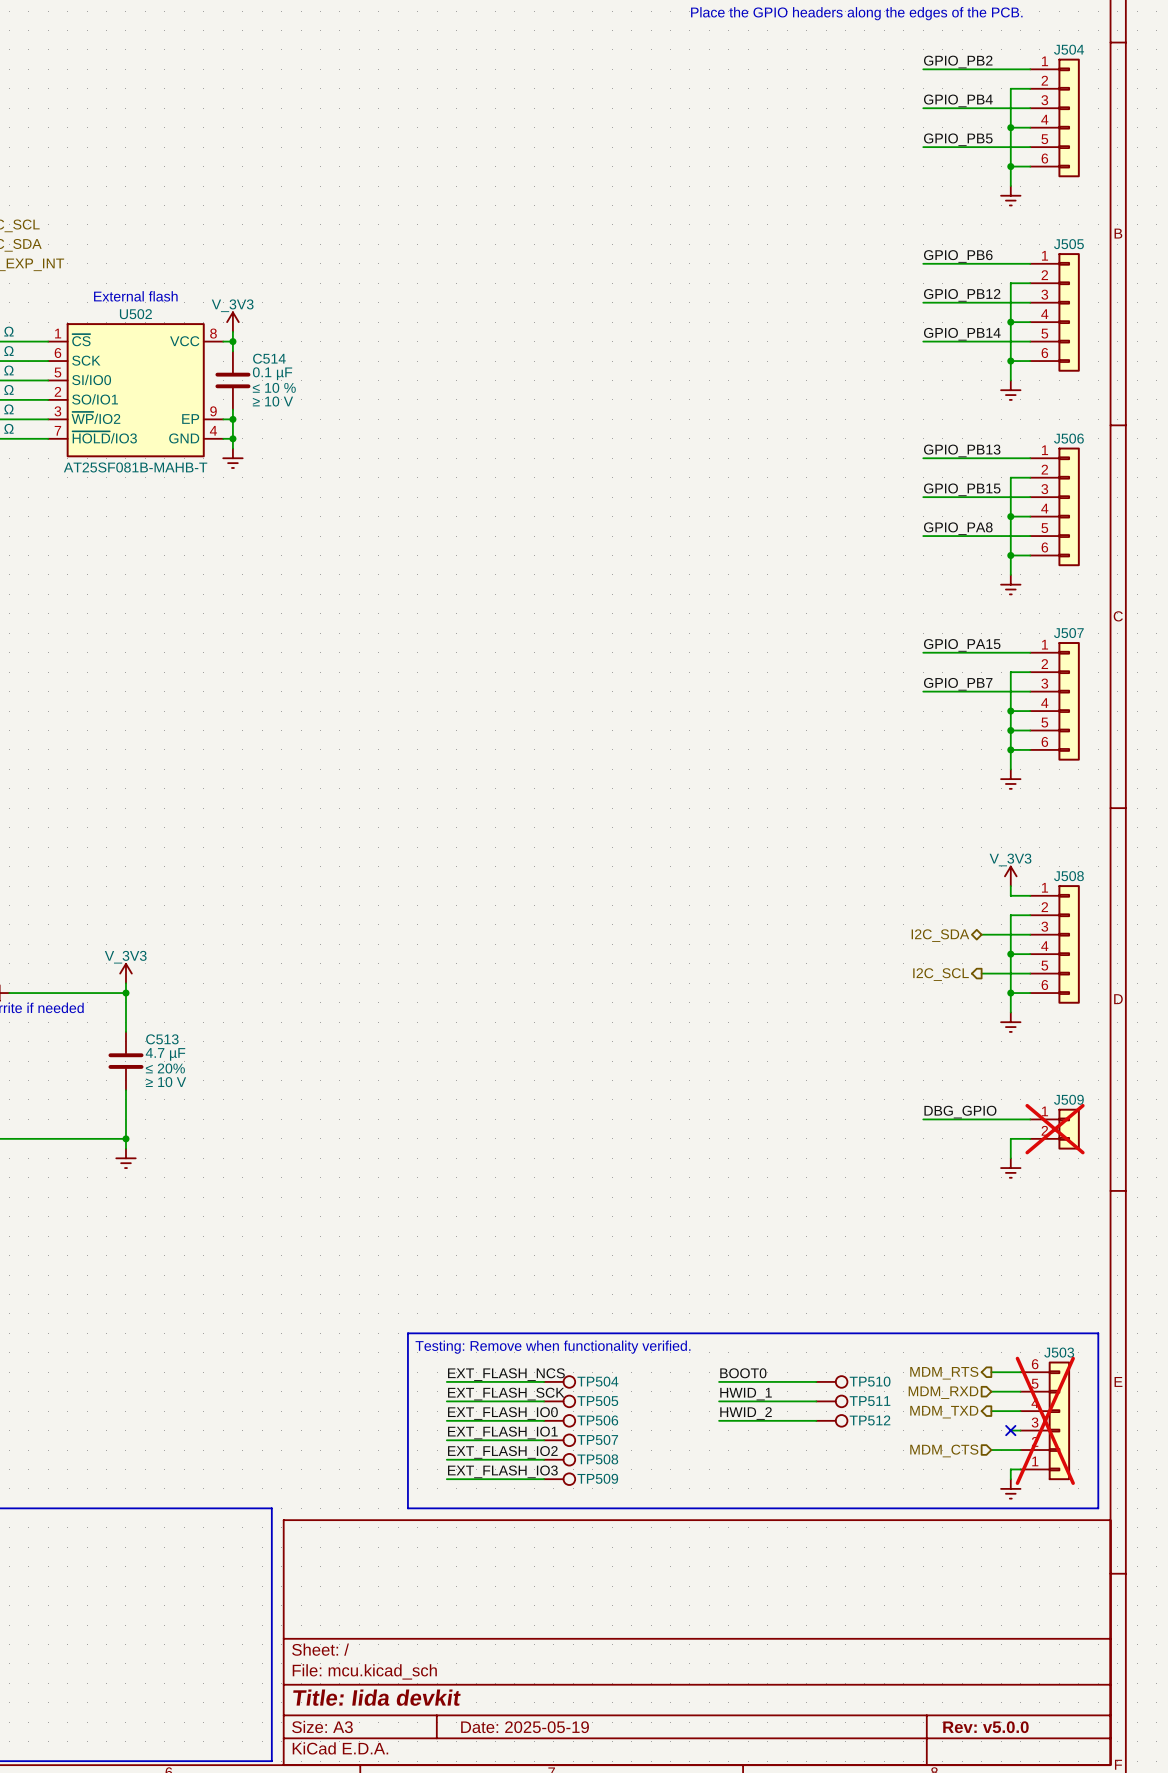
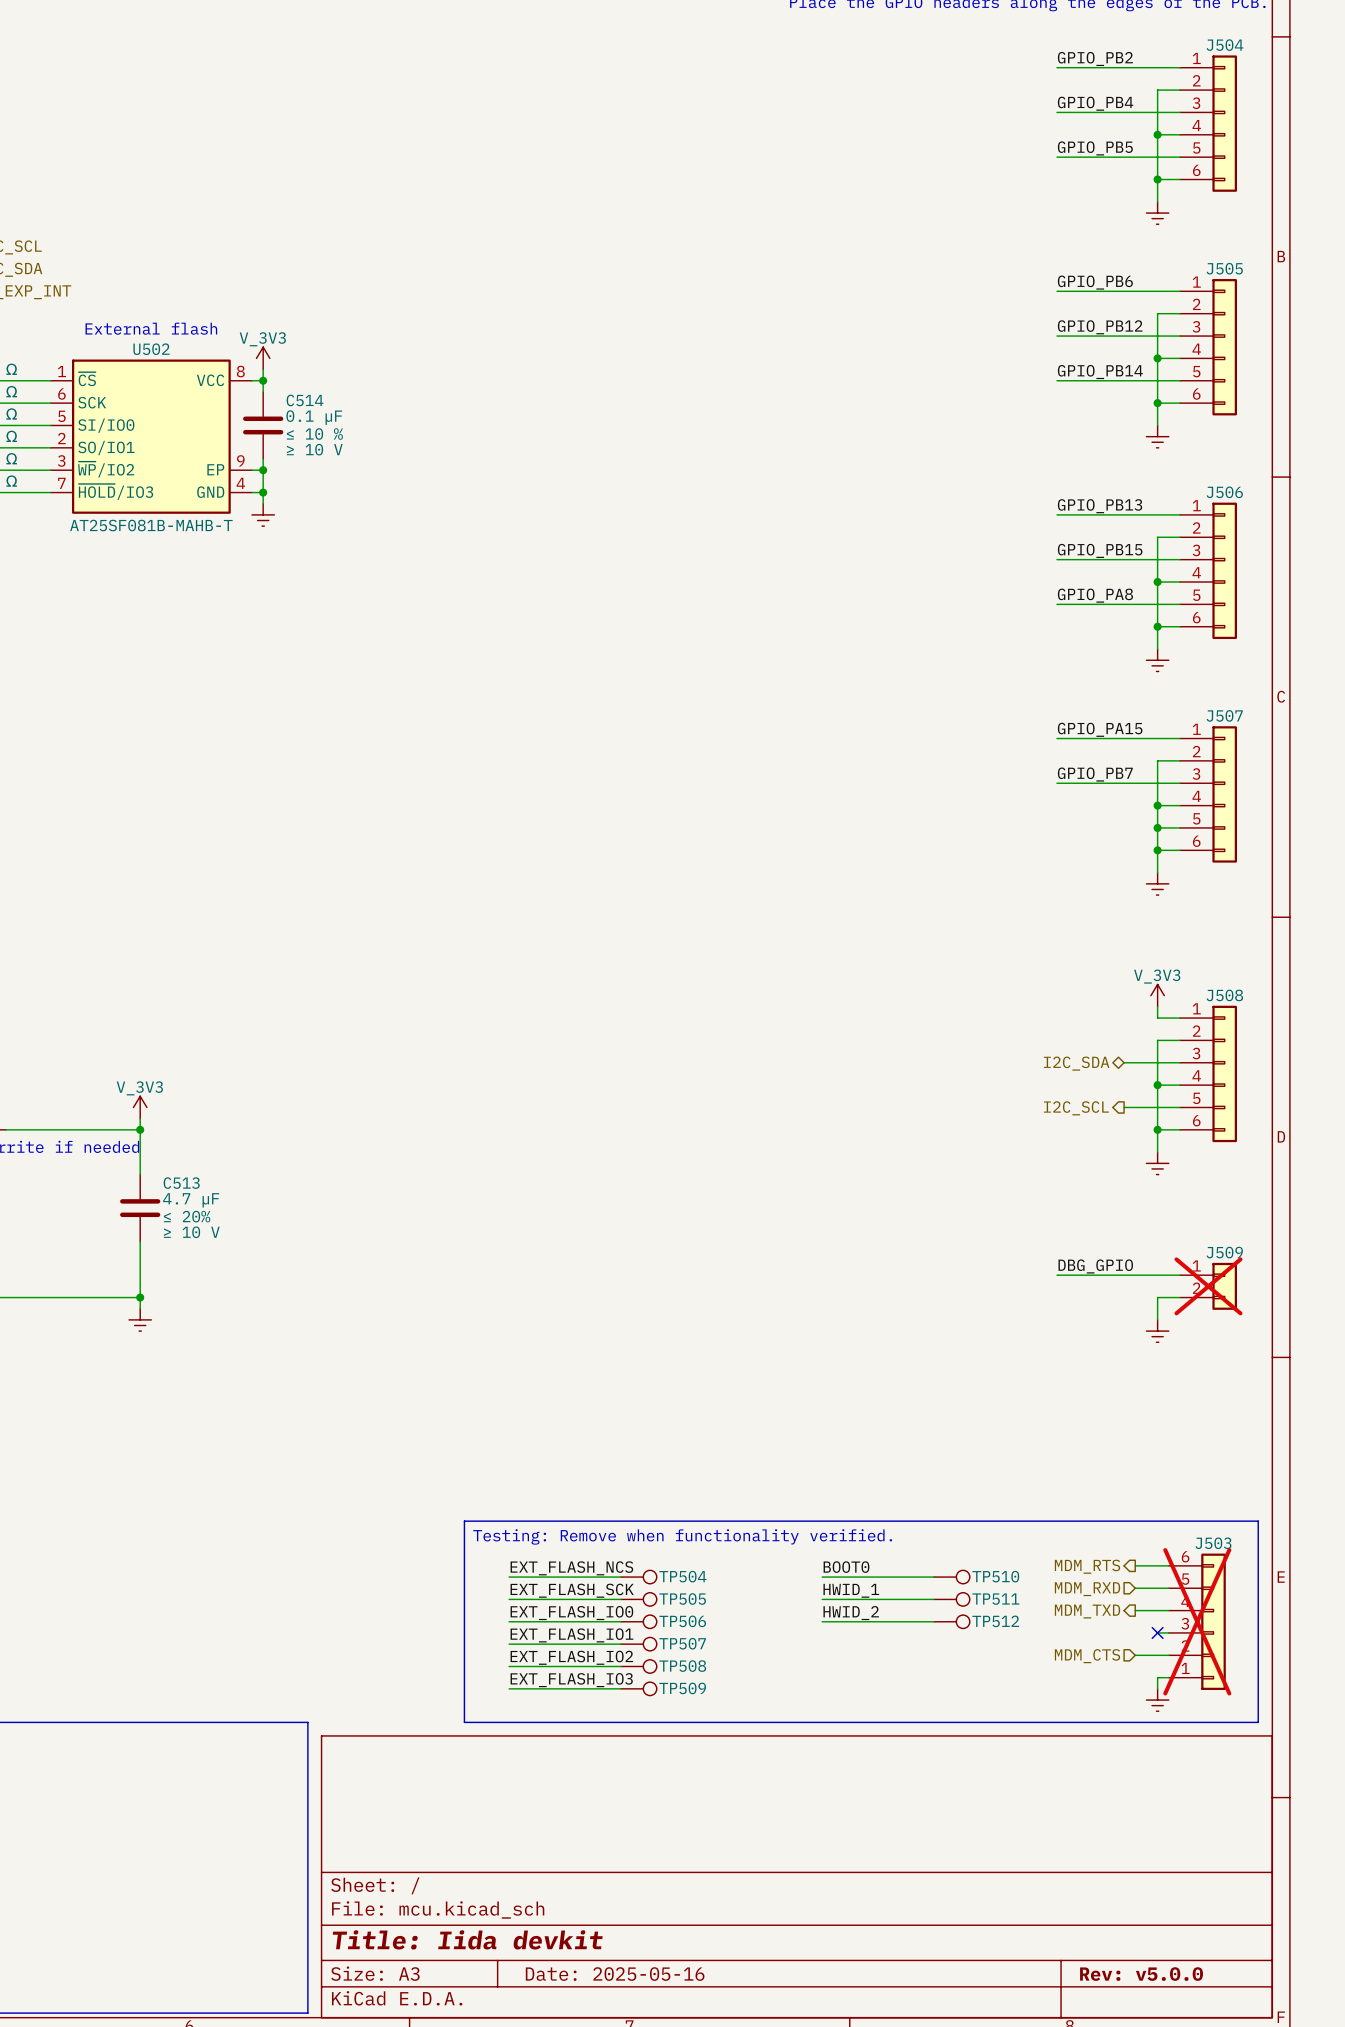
title block: Date: 2025-05-19 (525, 1727) -> Date: 2025-05-16 (615, 1974)

